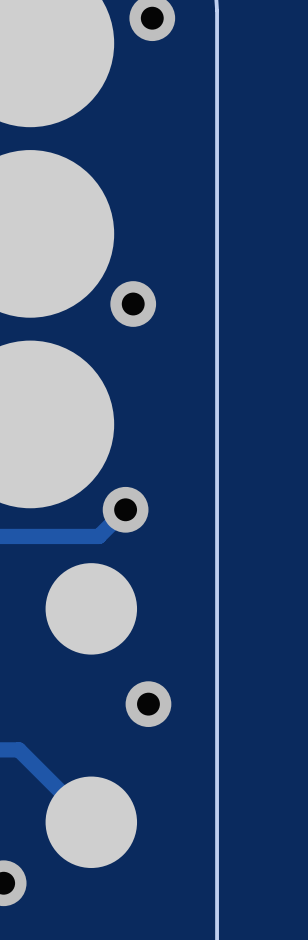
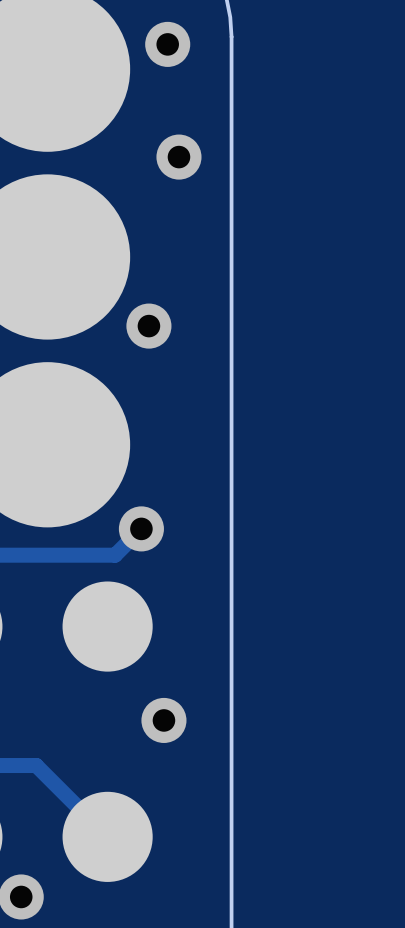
via: none -> (178, 157)

